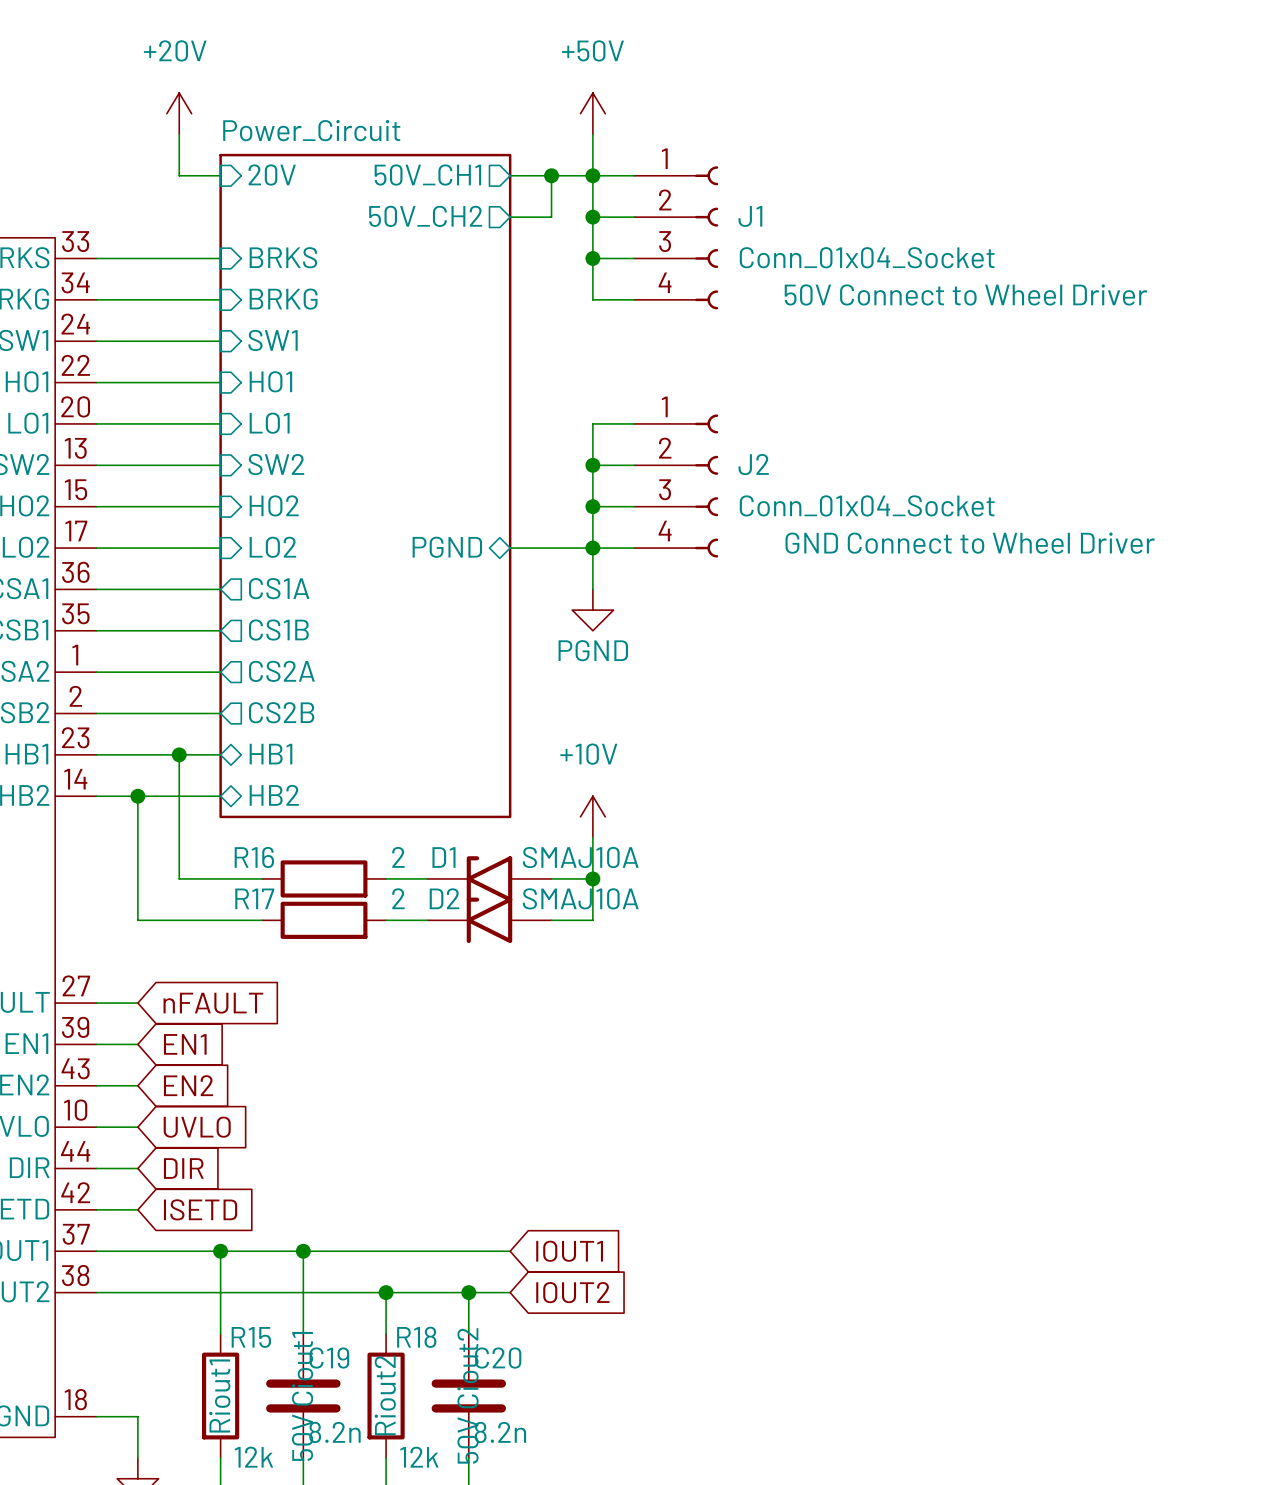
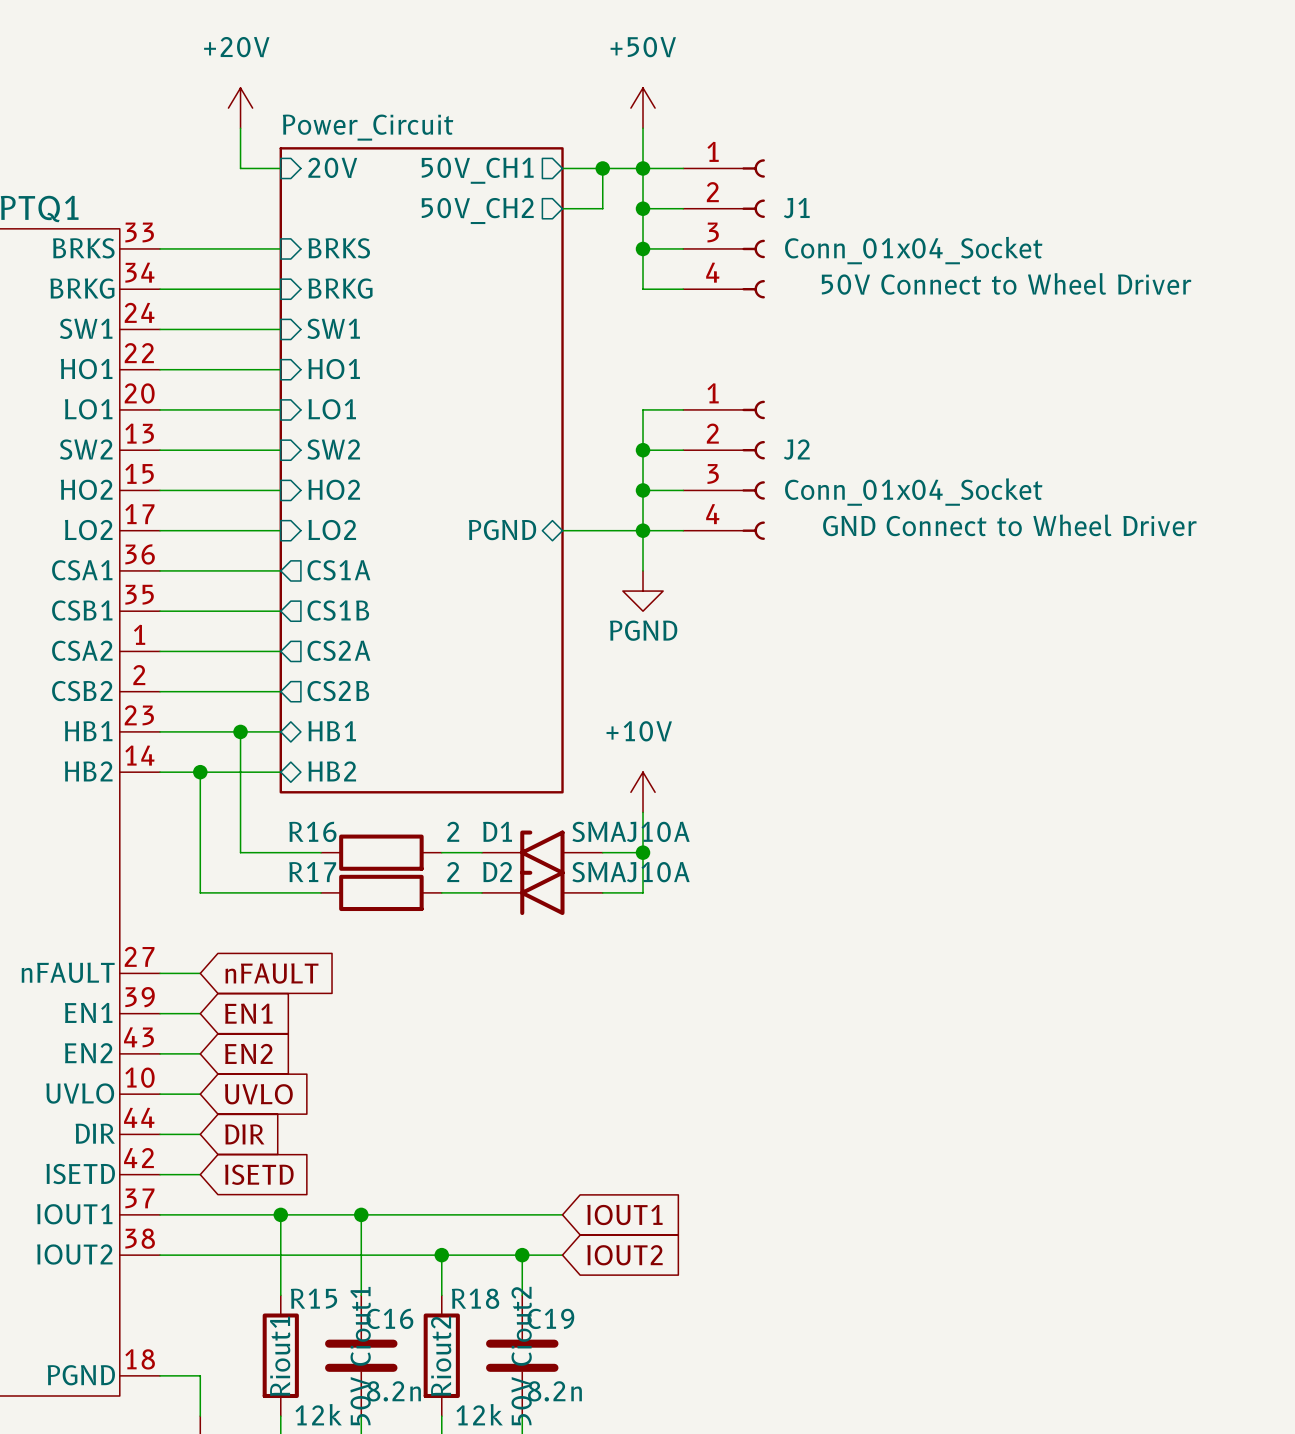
C19 name: C19 (329, 1358) -> C16 (389, 1318)
C20 name: C20 (498, 1358) -> C19 (550, 1318)

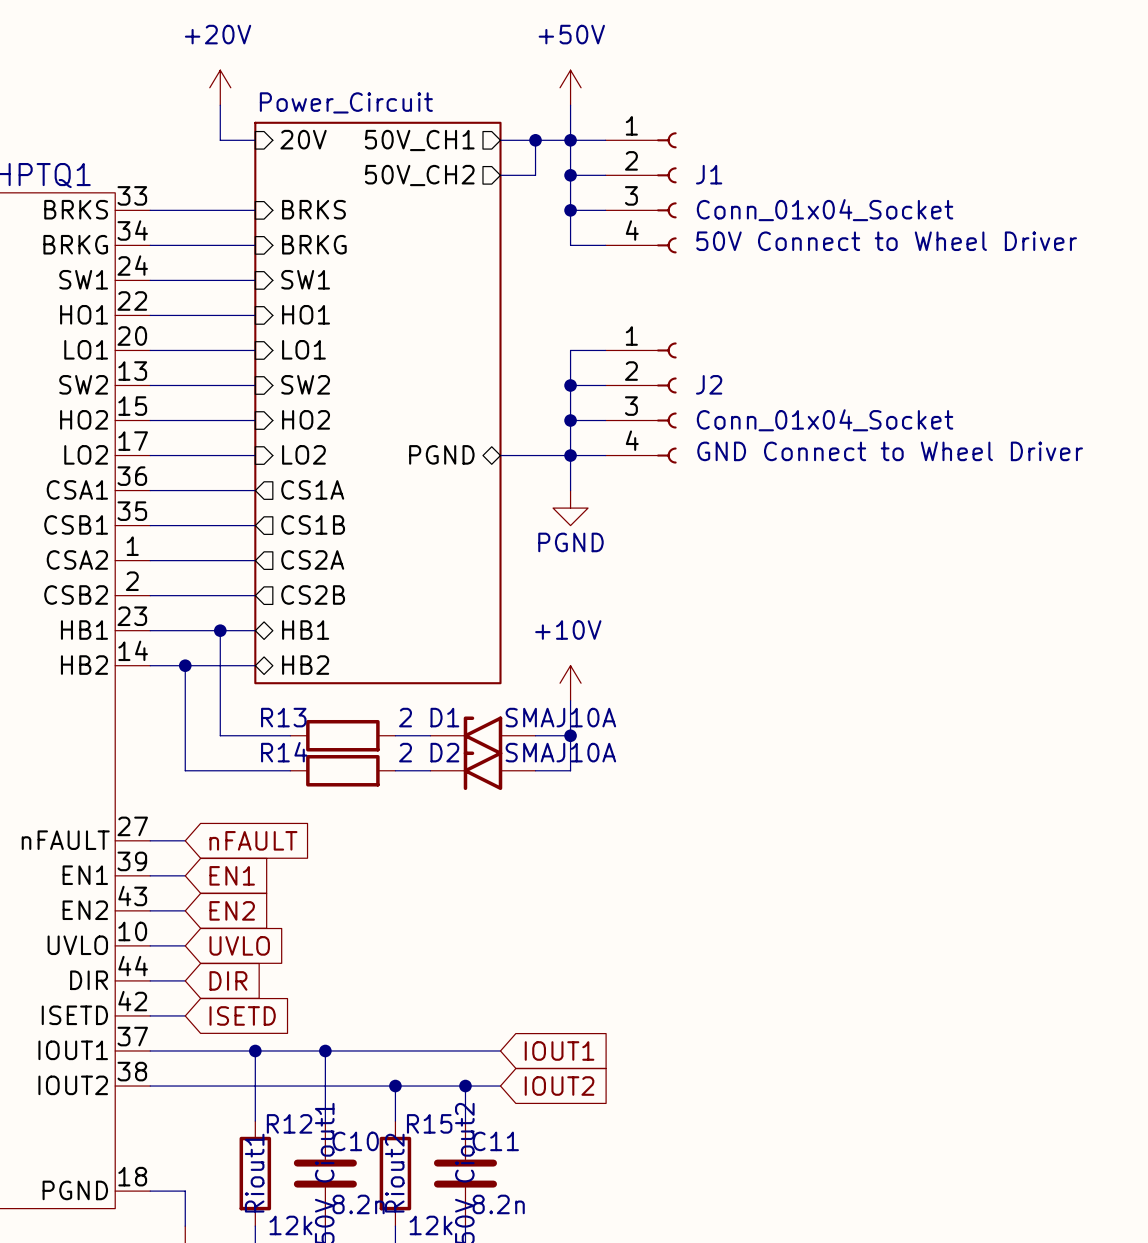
R16 name: R16 (312, 831) -> R13 (283, 717)
R17 name: R17 (312, 872) -> R14 (284, 752)
R15 name: R15 (314, 1298) -> R12 (289, 1123)
R18 name: R18 (475, 1298) -> R15 (429, 1123)
C16 name: C16 (389, 1318) -> C10 (355, 1141)
C19 name: C19 (550, 1318) -> C11 (495, 1141)

